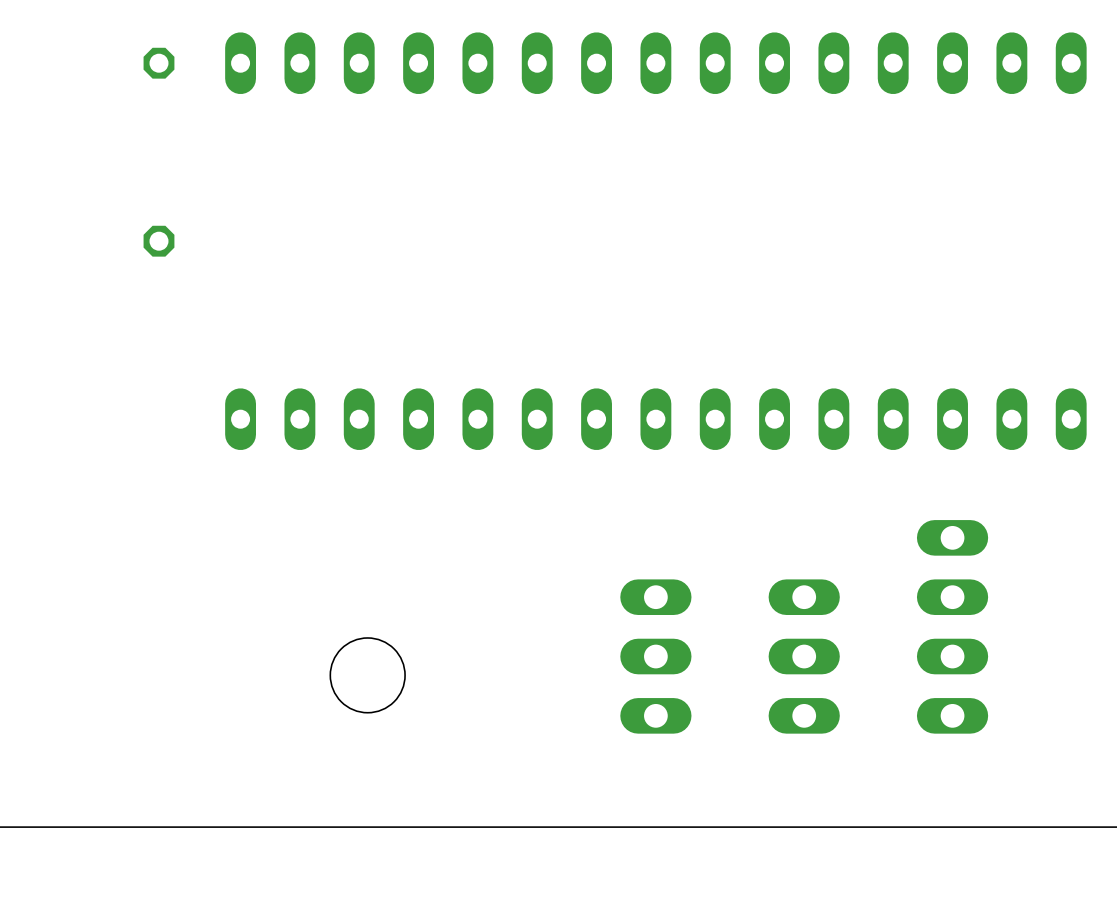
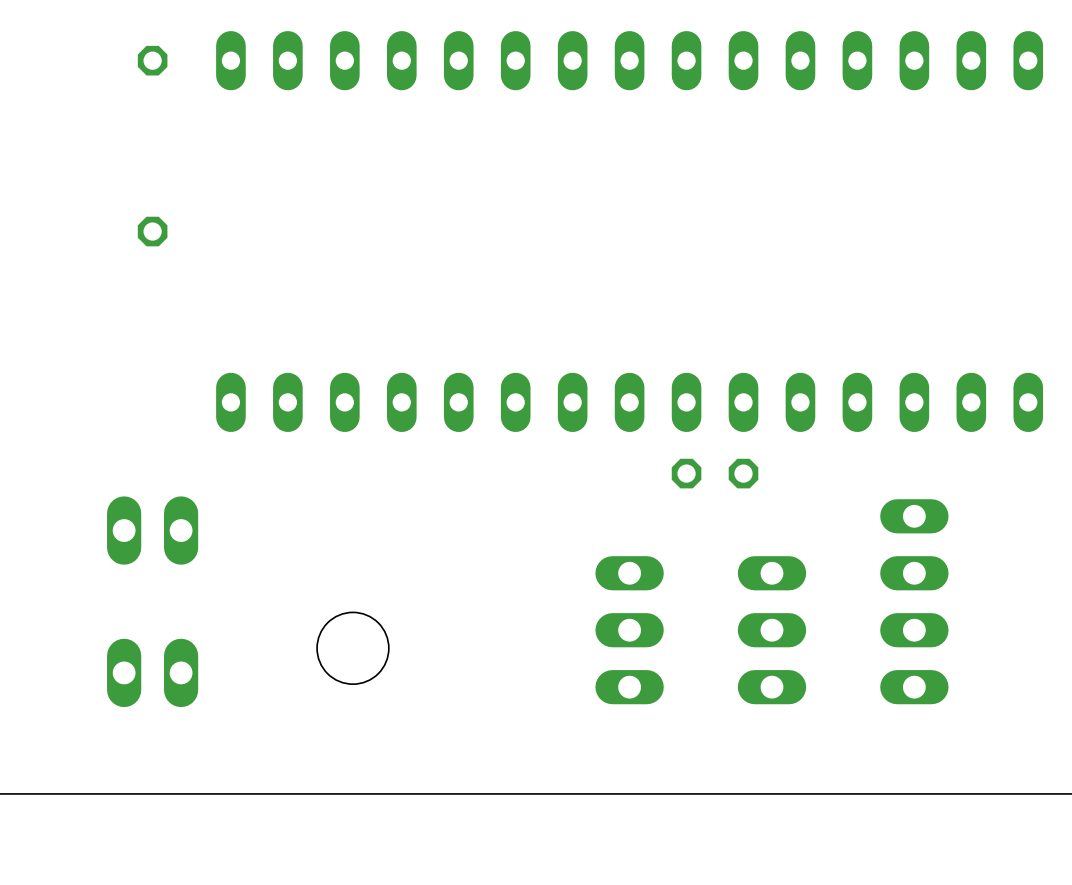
part: none -> (715, 473)
part: none -> (152, 530)
part: none -> (152, 672)

